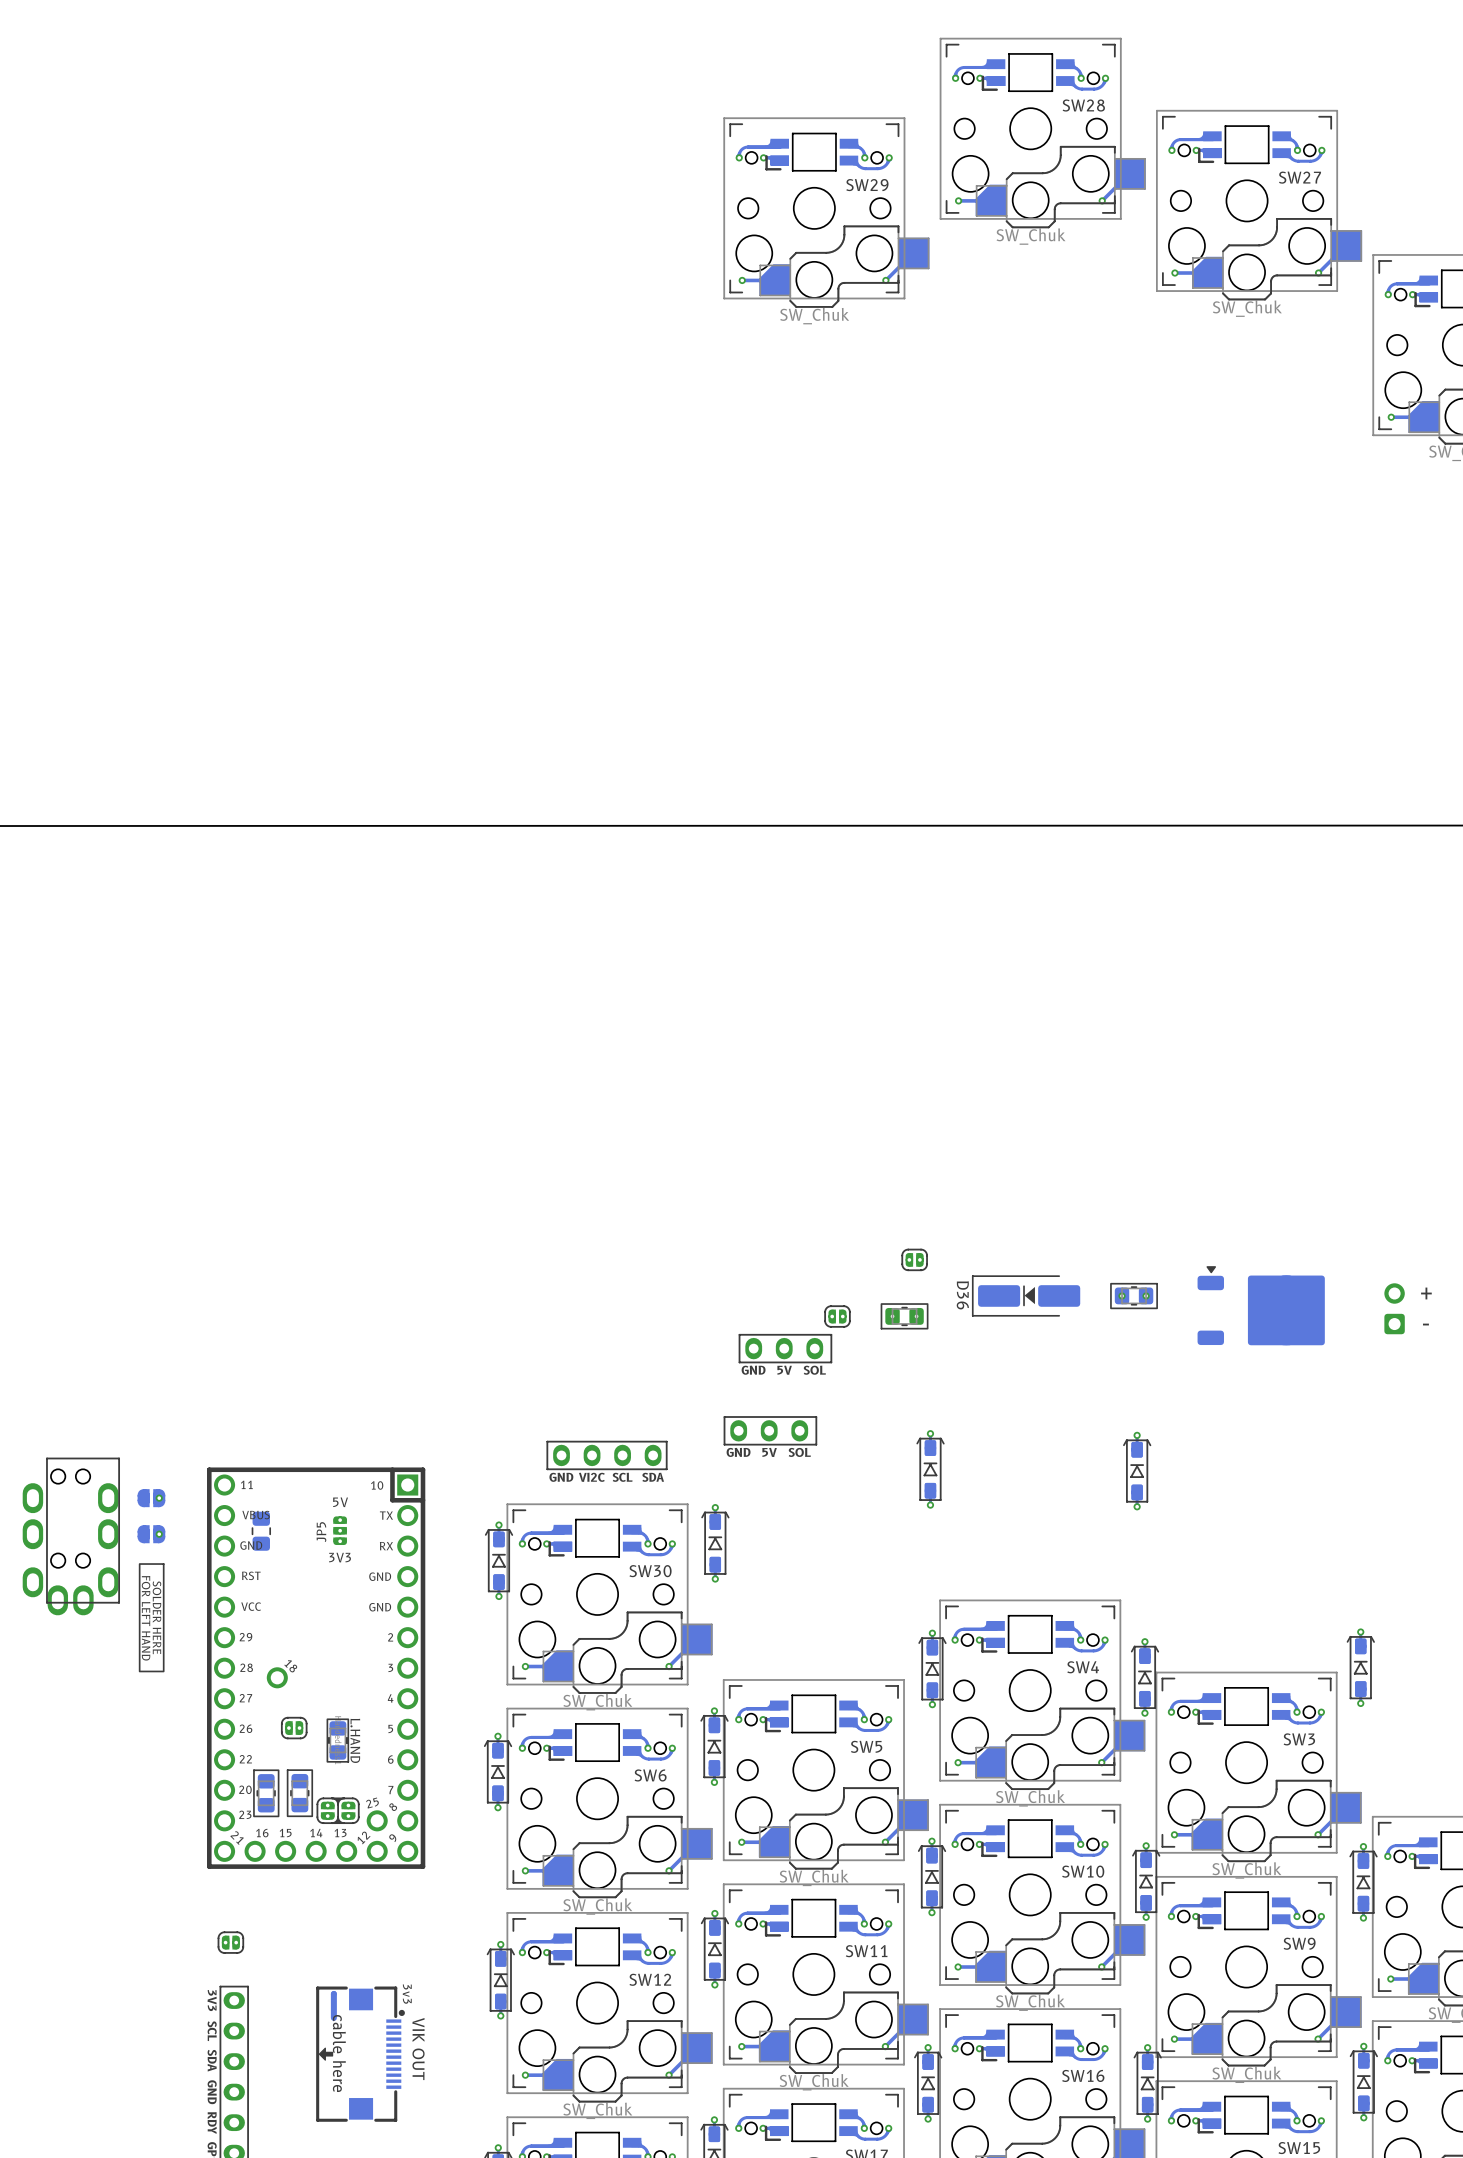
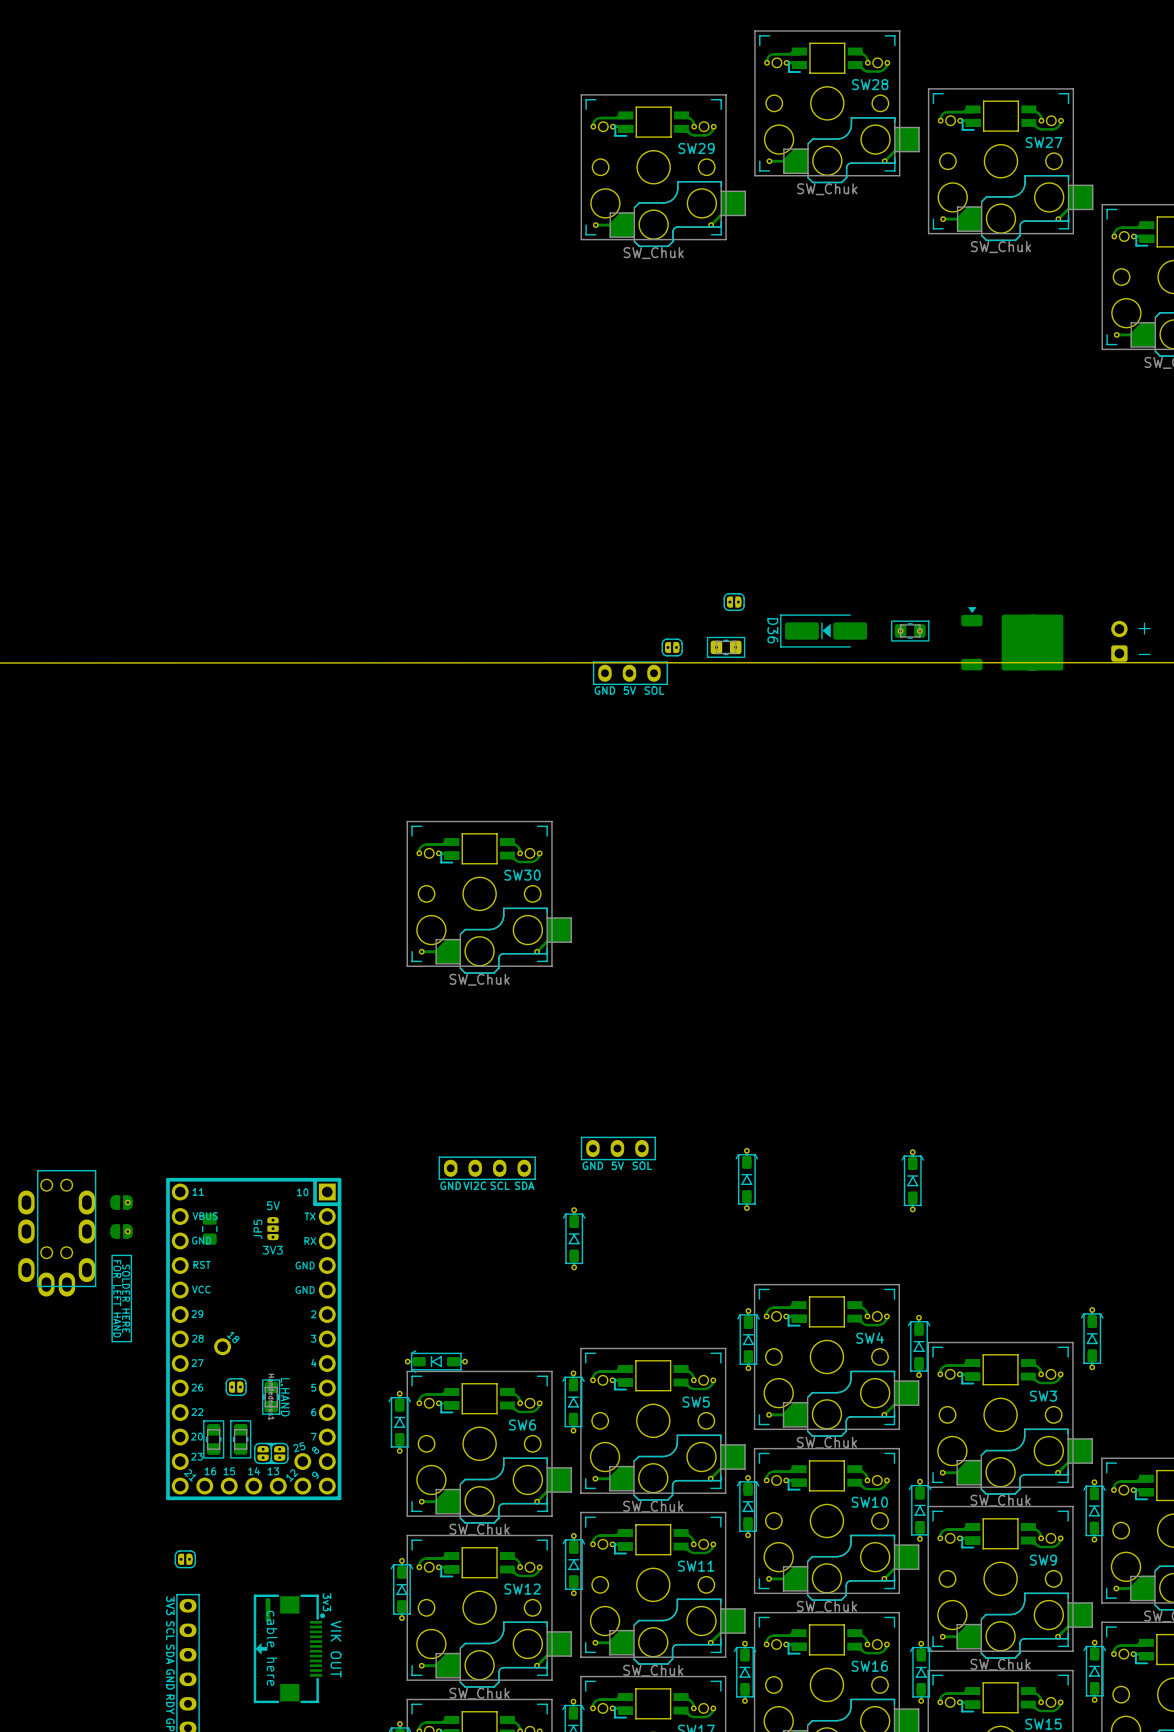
part: none -> (734, 602)
part: none -> (910, 631)
part: none -> (1012, 638)
part: none -> (1119, 641)
part: none -> (672, 647)
part: none -> (726, 647)
part: none -> (630, 673)
part: (914, 1259) -> none
D36 position: (1026, 1295) -> (823, 631)
part: (1134, 1296) -> none
part: (1261, 1305) -> none
part: (1394, 1308) -> none
part: (837, 1316) -> none
part: (904, 1316) -> none
part: (785, 1348) -> none
part rotation: 0° (499, 1560) -> 90° counterclockwise (436, 1361)
part position: (499, 1560) -> (436, 1361)
SW30 position: (609, 1598) -> (489, 897)

